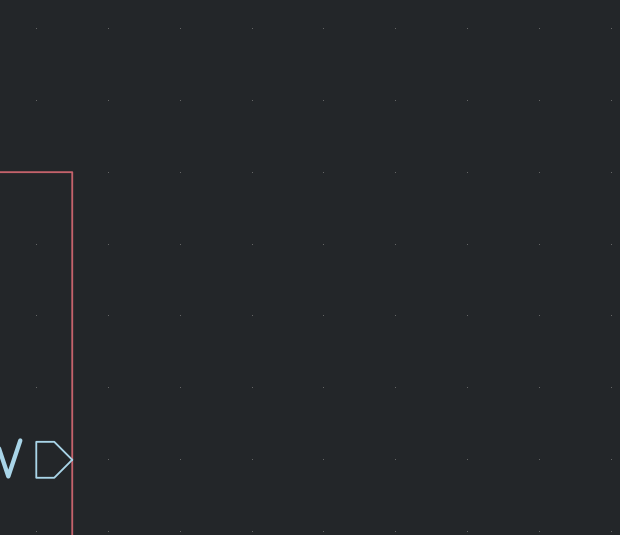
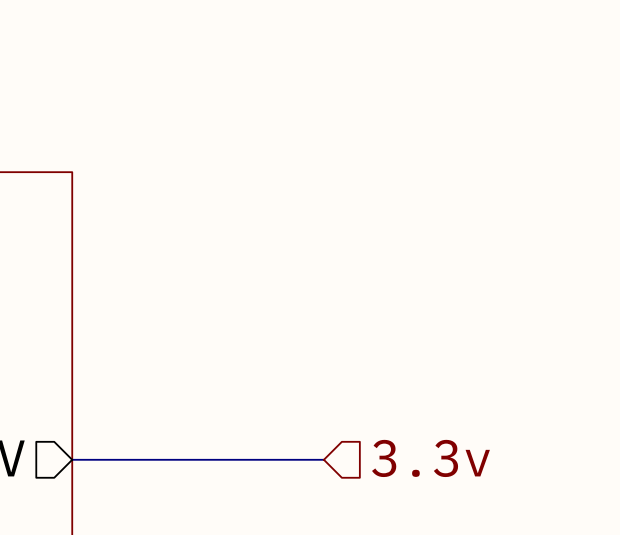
hierarchical label: none -> 3.3v (430, 458)
wire: none -> (72, 459) (323, 459)

